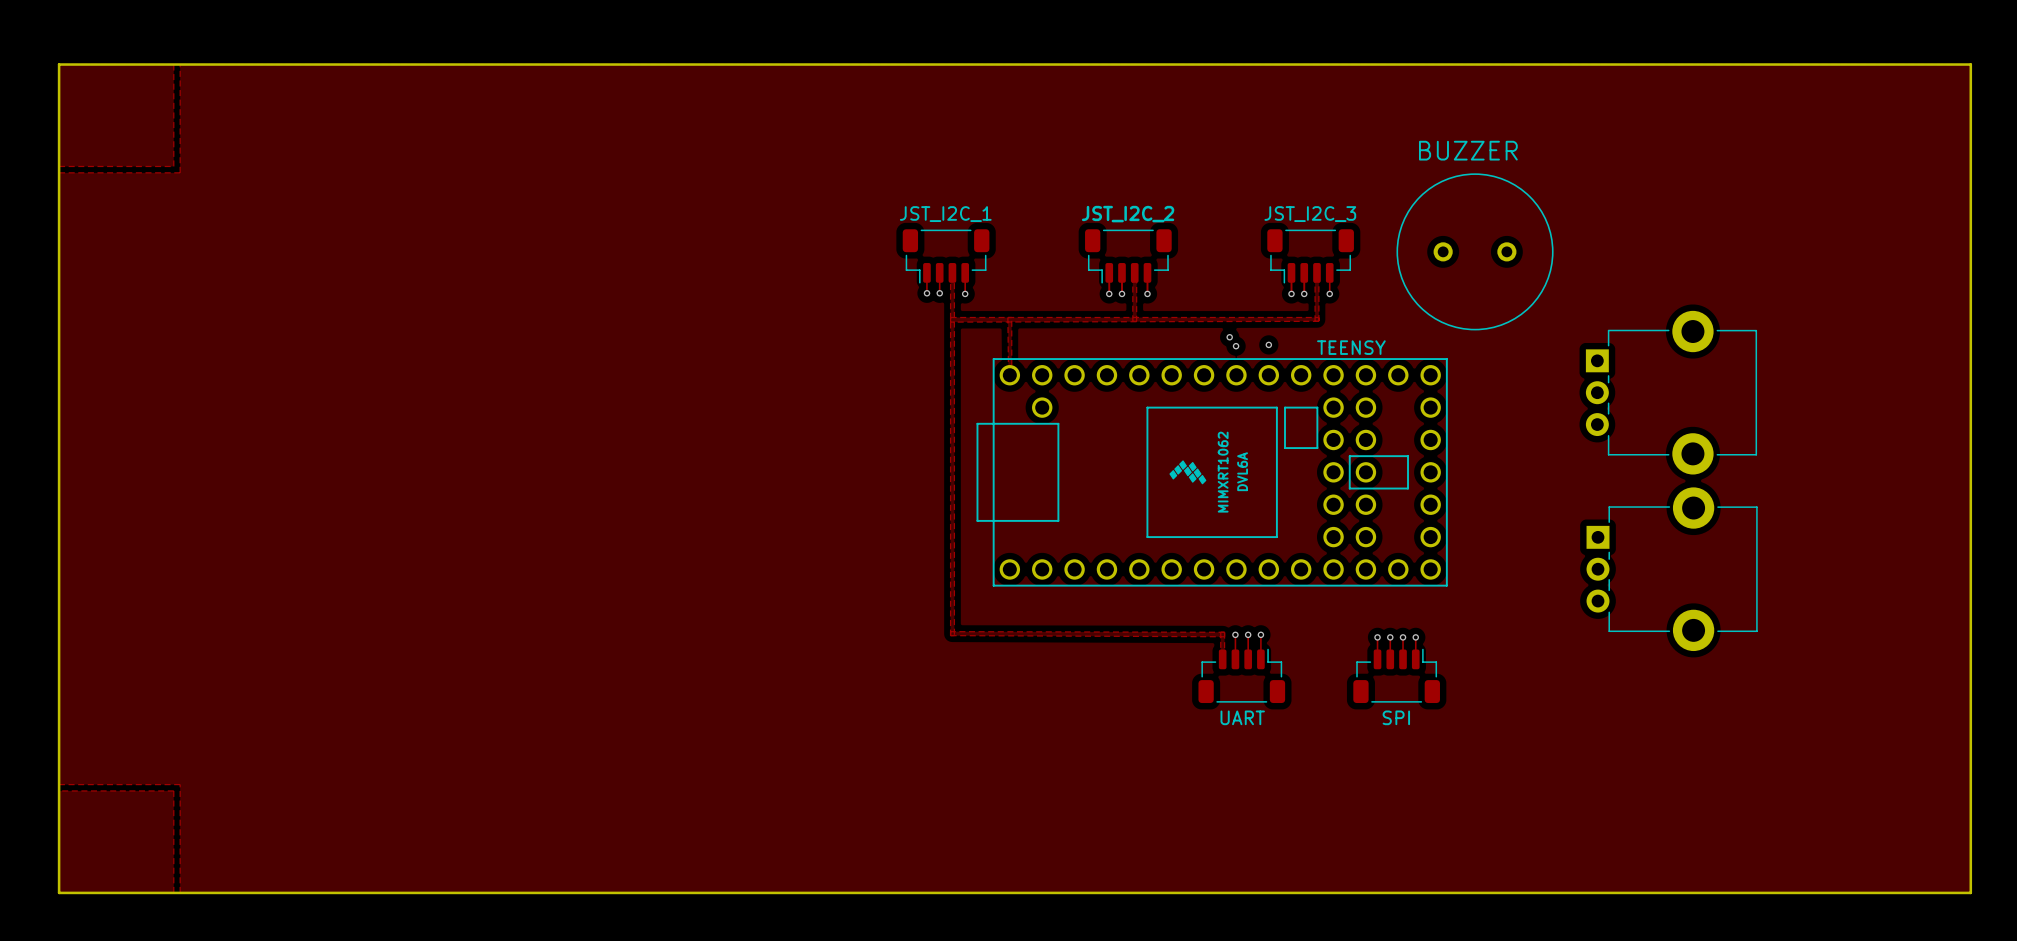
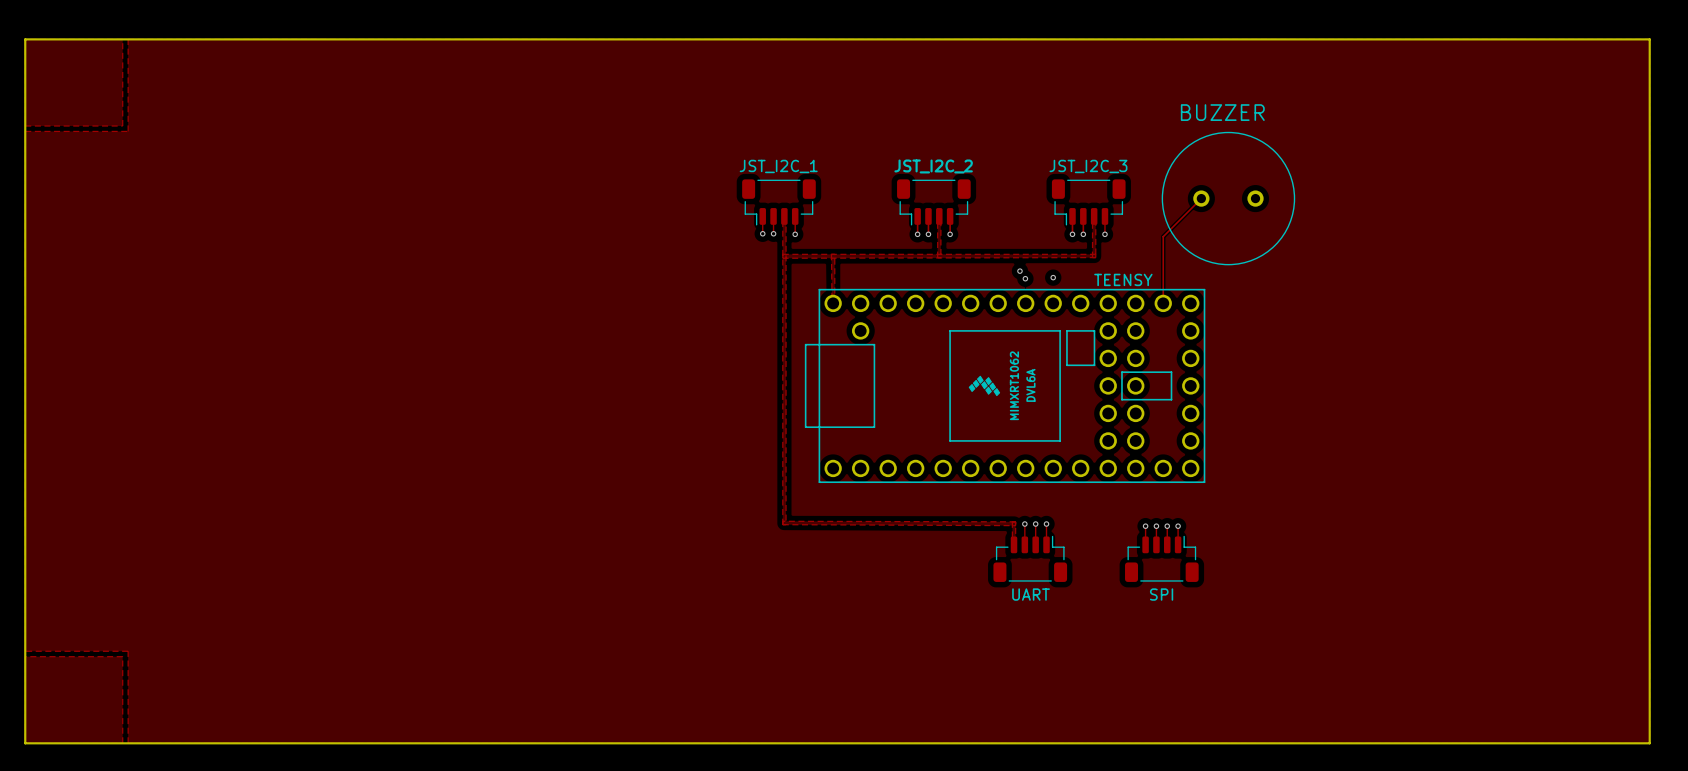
track: none -> (1201, 198) (1163, 236) (1163, 303)
part: (1671, 392) -> none
part: (1672, 569) -> none

